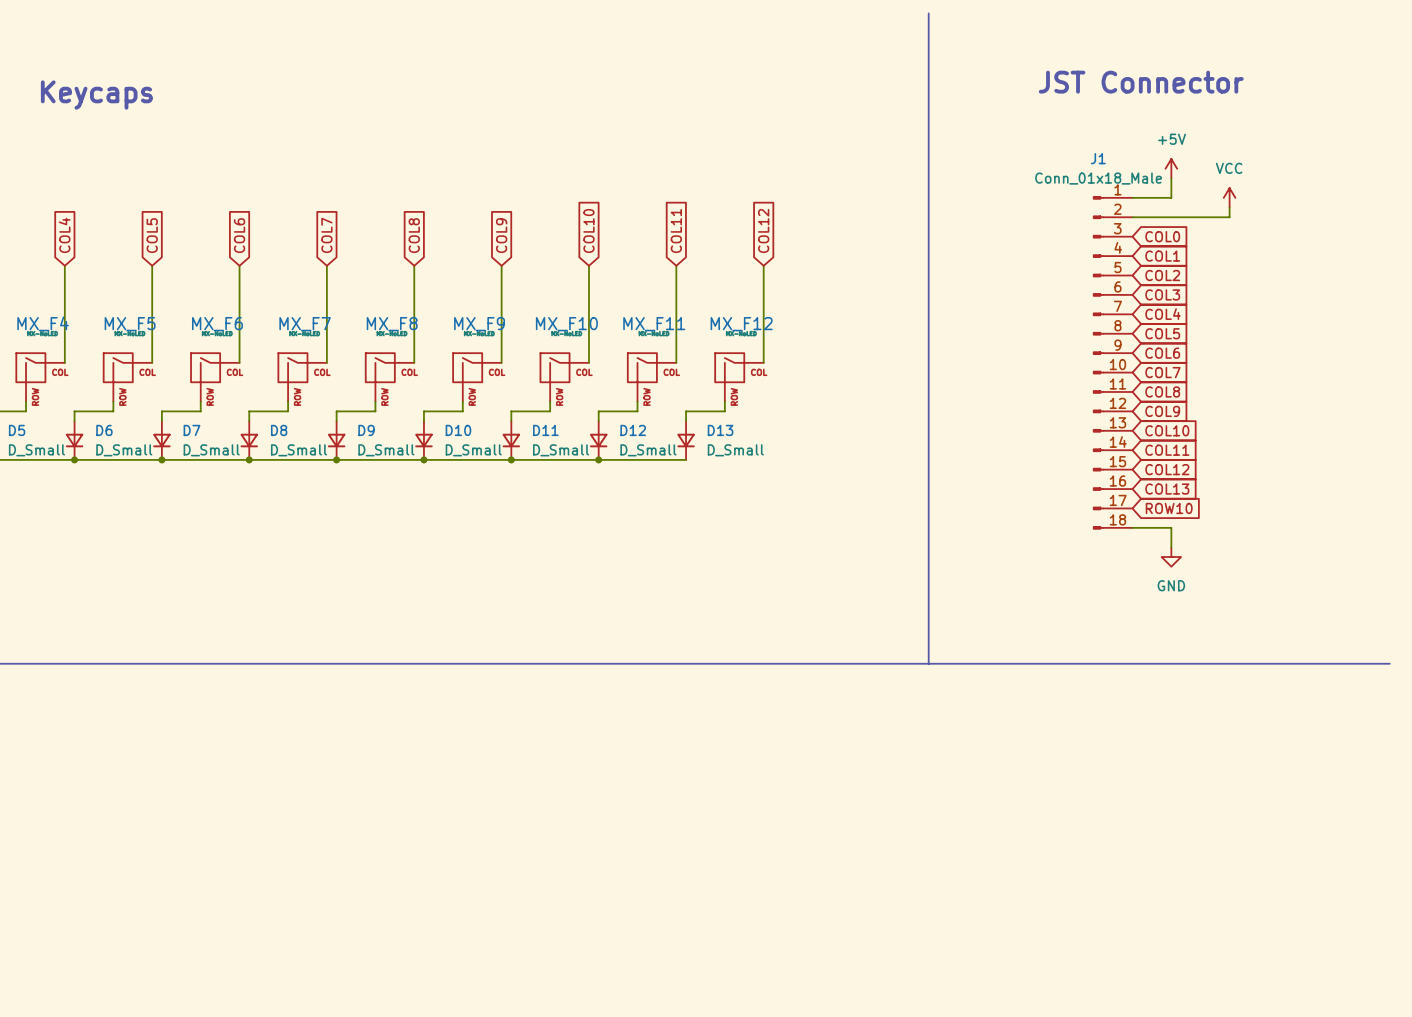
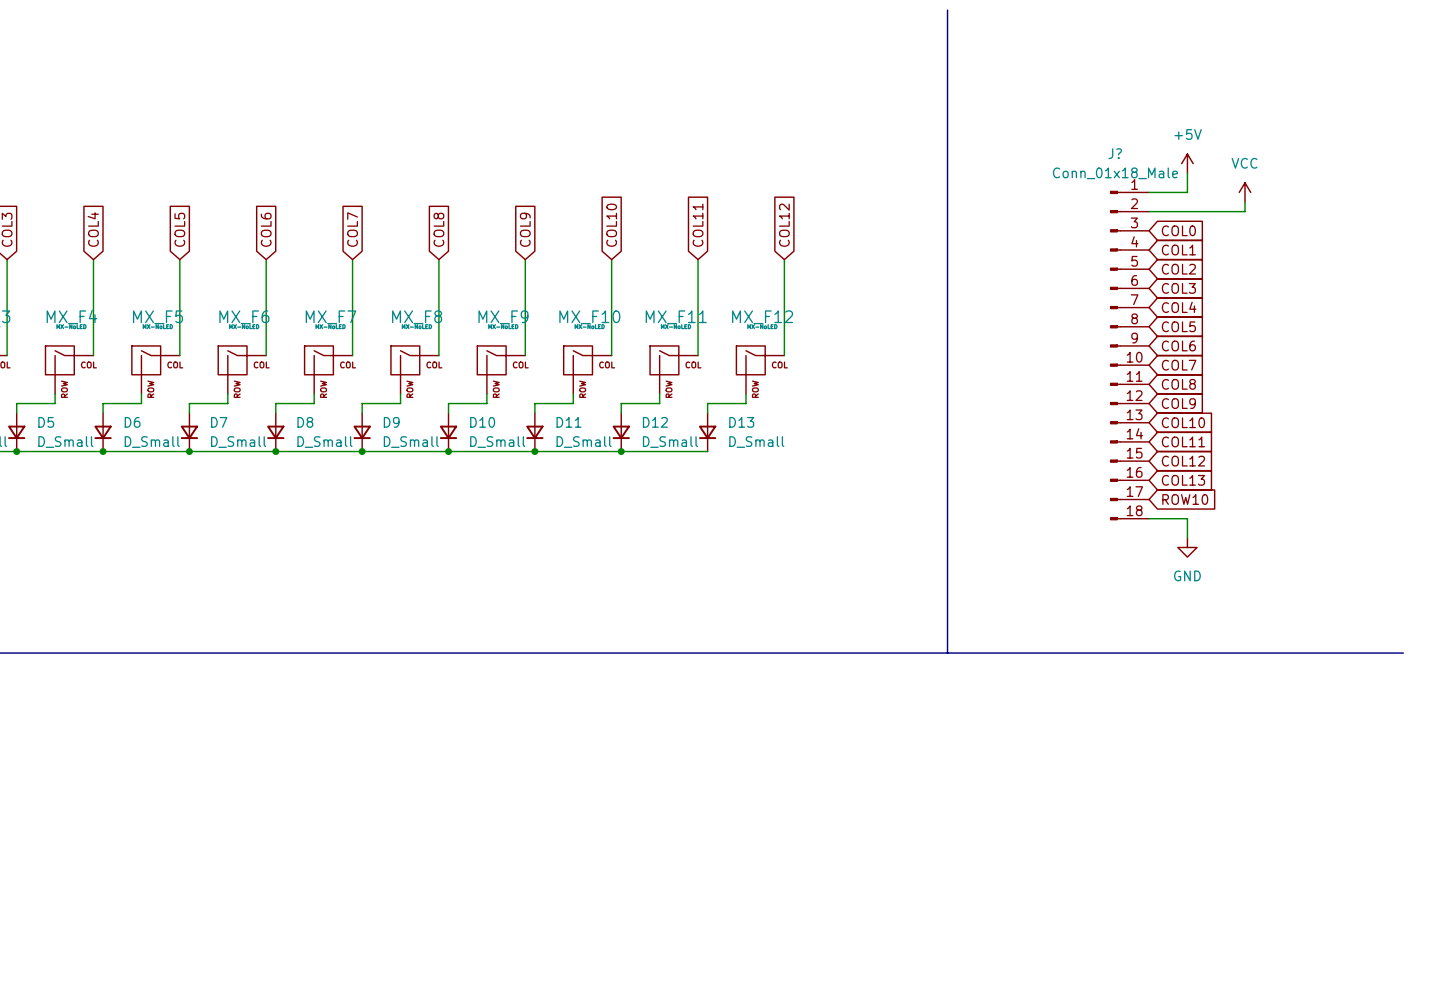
text: JST Connector (1141, 82) -> none
text: Keycaps (96, 95) -> none
J1 name: J1 (1098, 158) -> J? (1115, 153)

